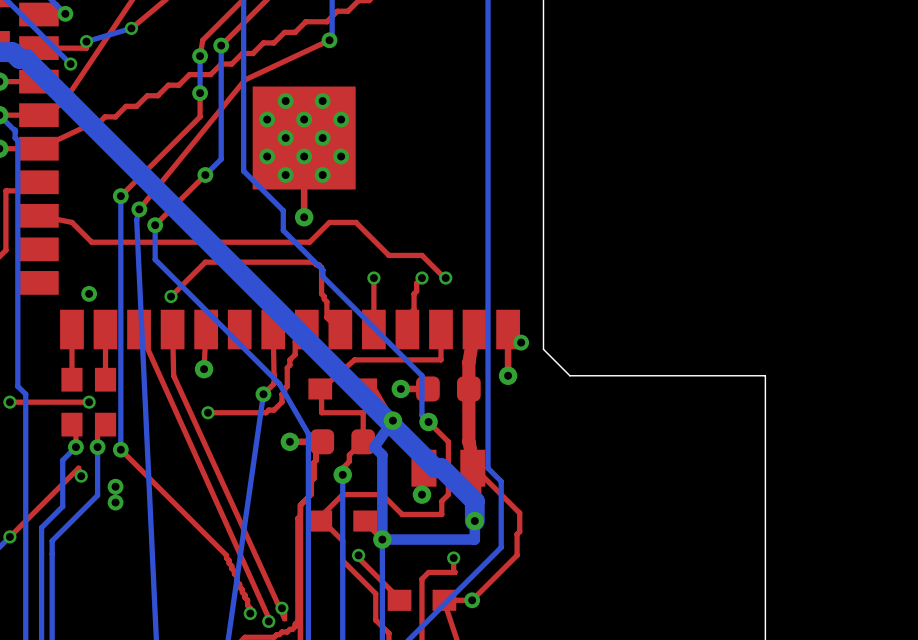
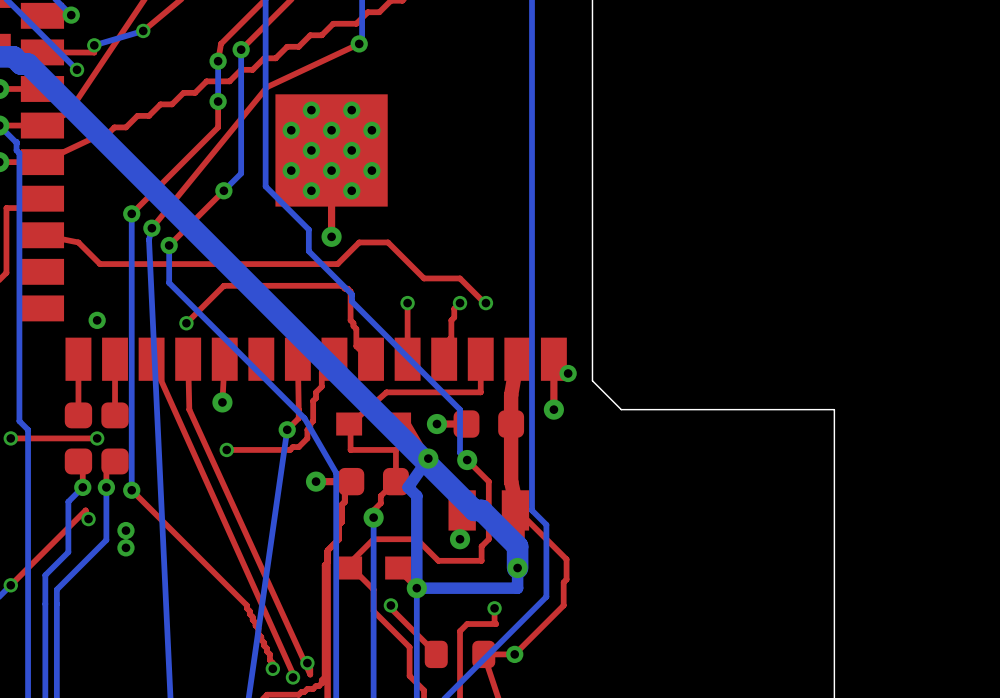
part footprint: [61, 367, 83, 437] -> [64, 402, 93, 475]
part footprint: [94, 367, 117, 437] -> [101, 402, 129, 475]
part footprint: [387, 589, 457, 611] -> [424, 640, 496, 669]

